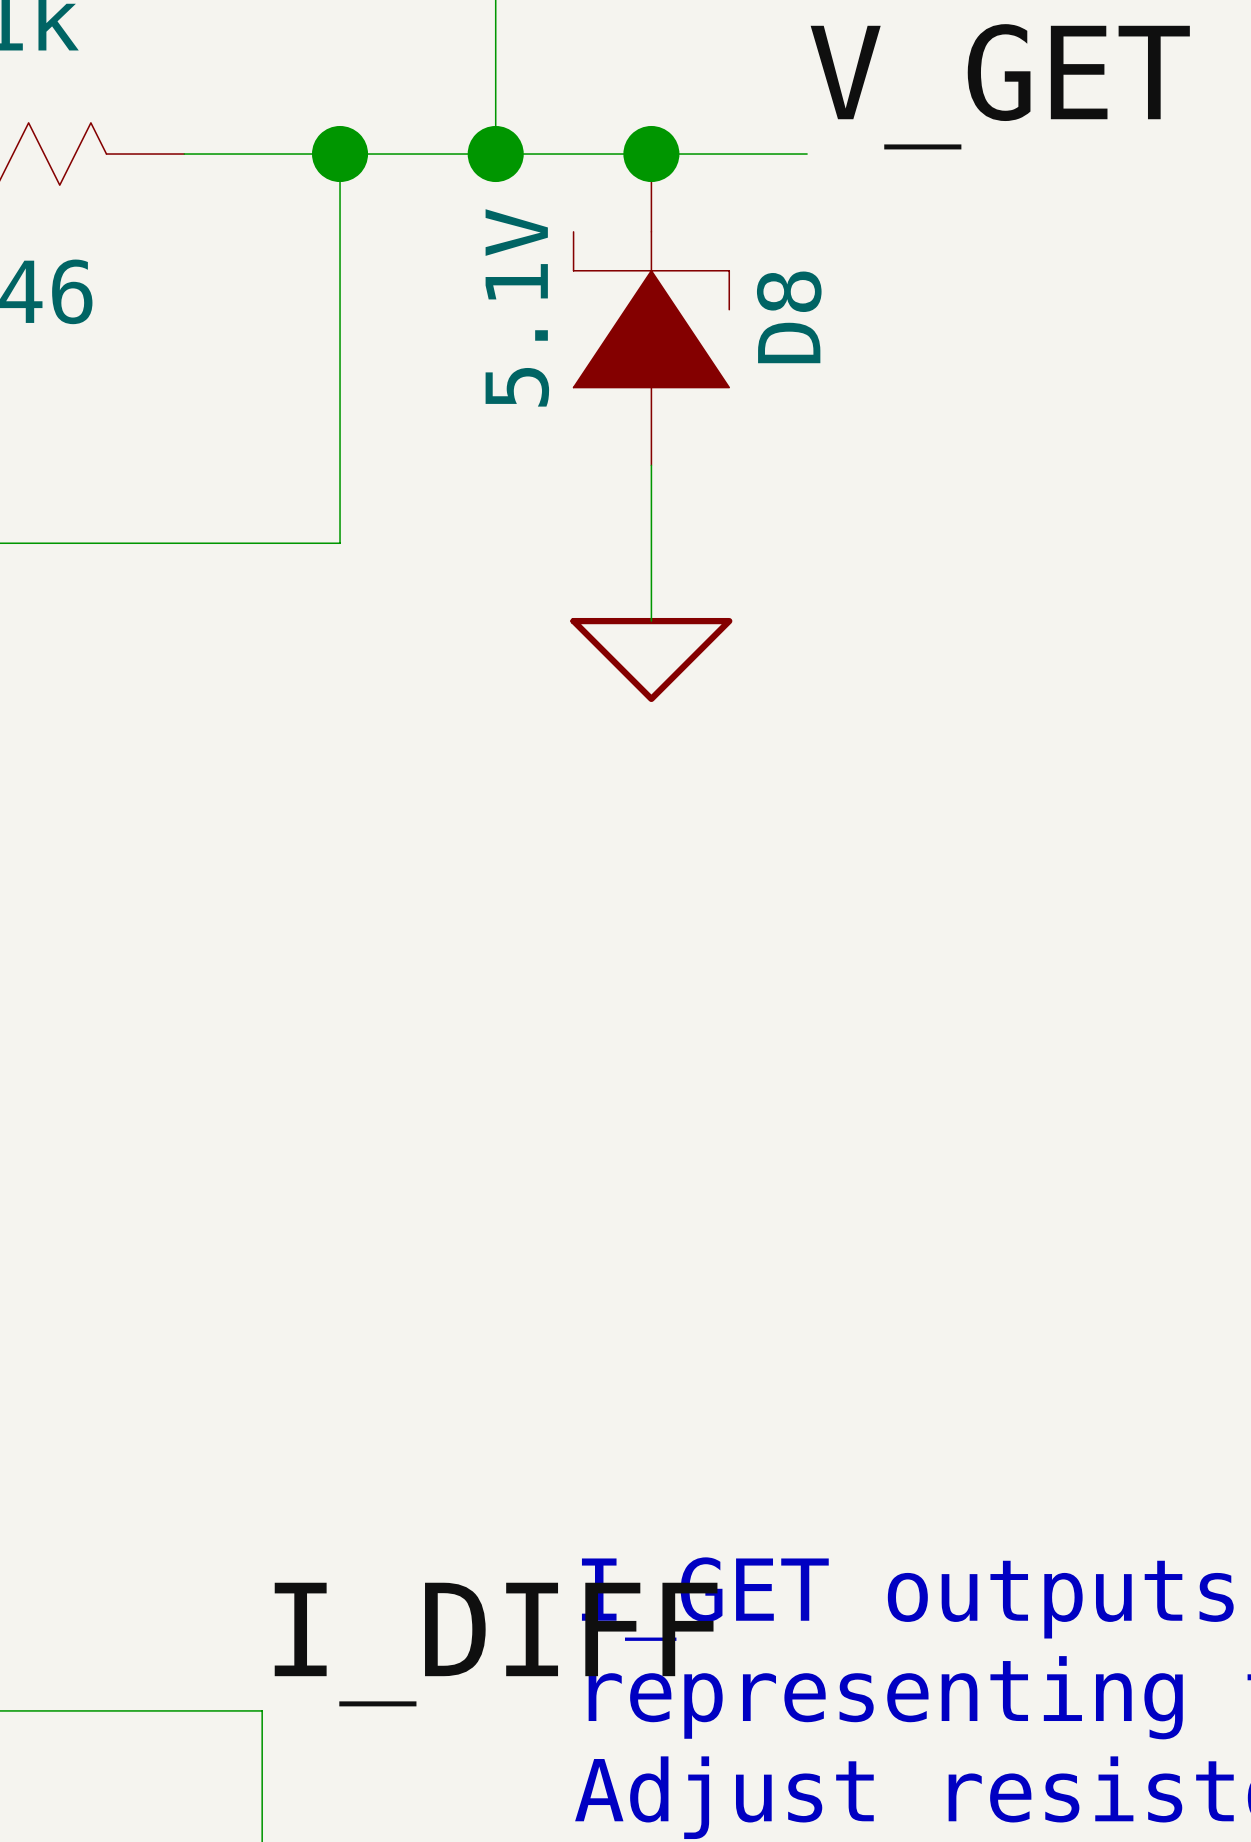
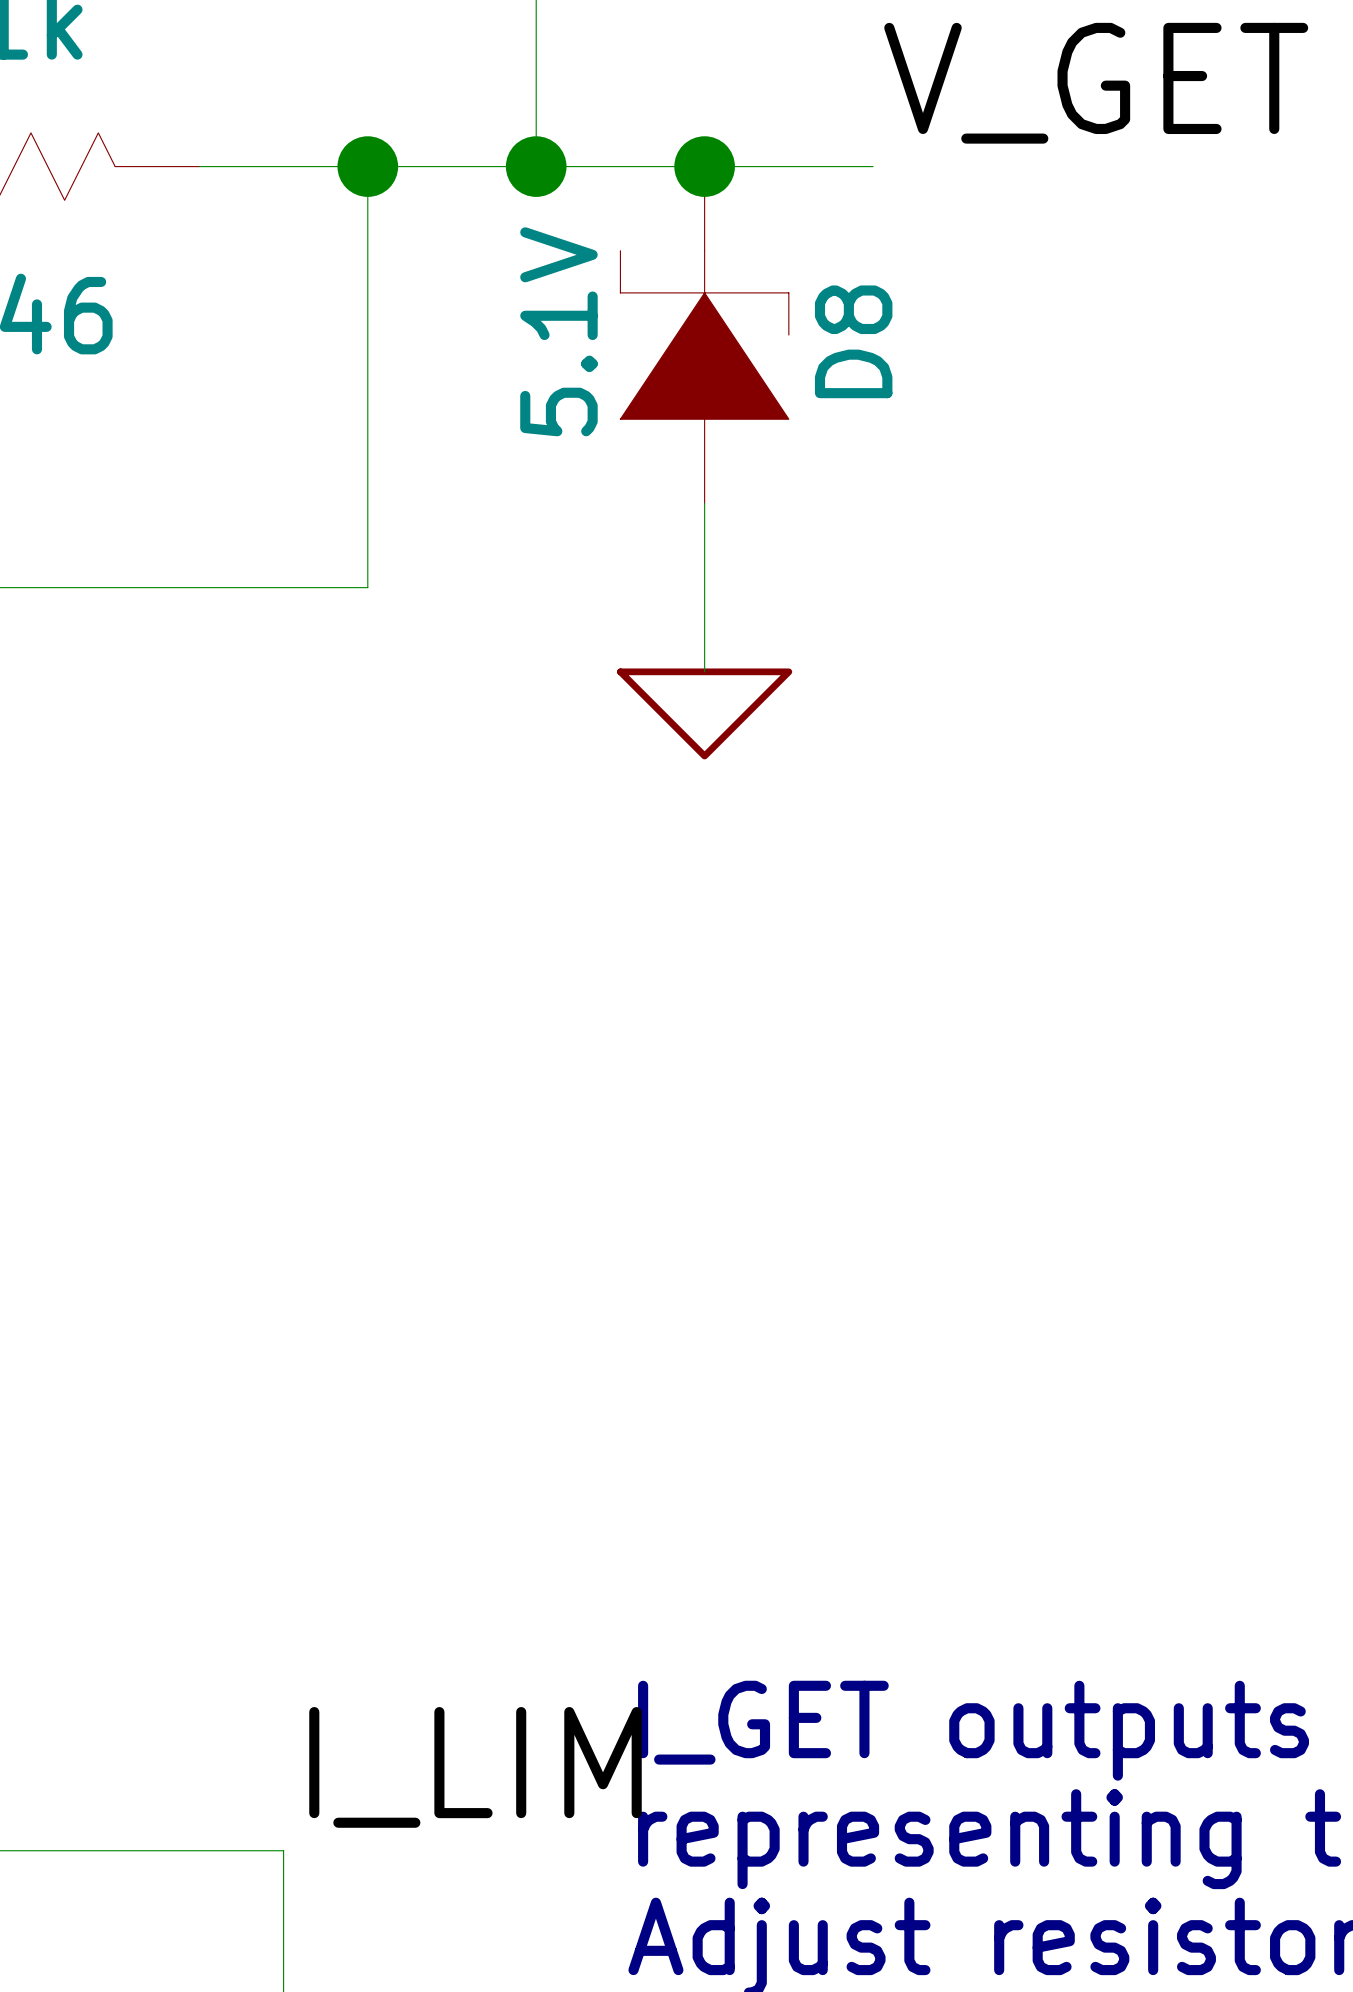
label: I_DIFF (496, 1644) -> I_LIM (475, 1767)

